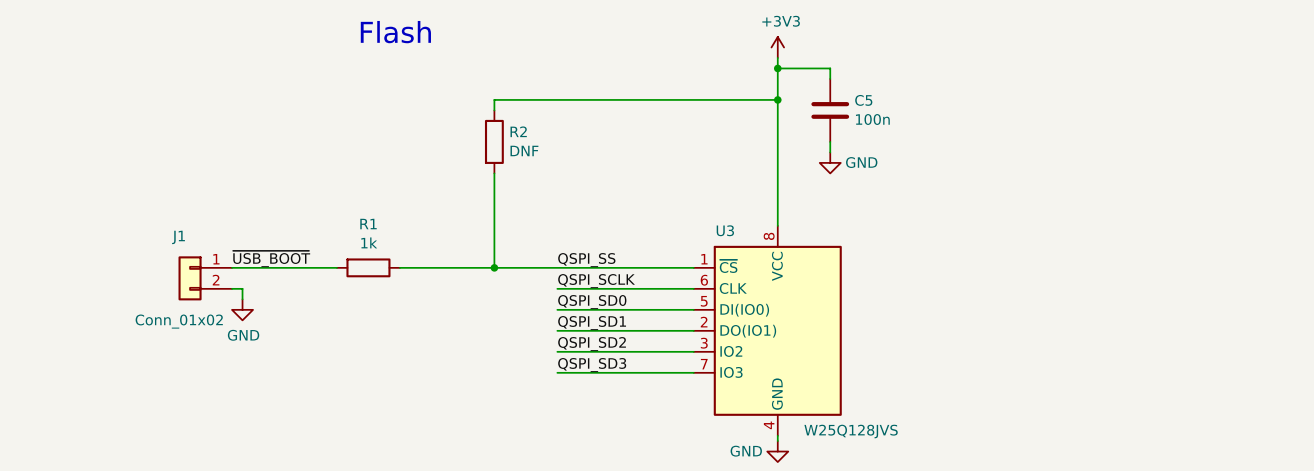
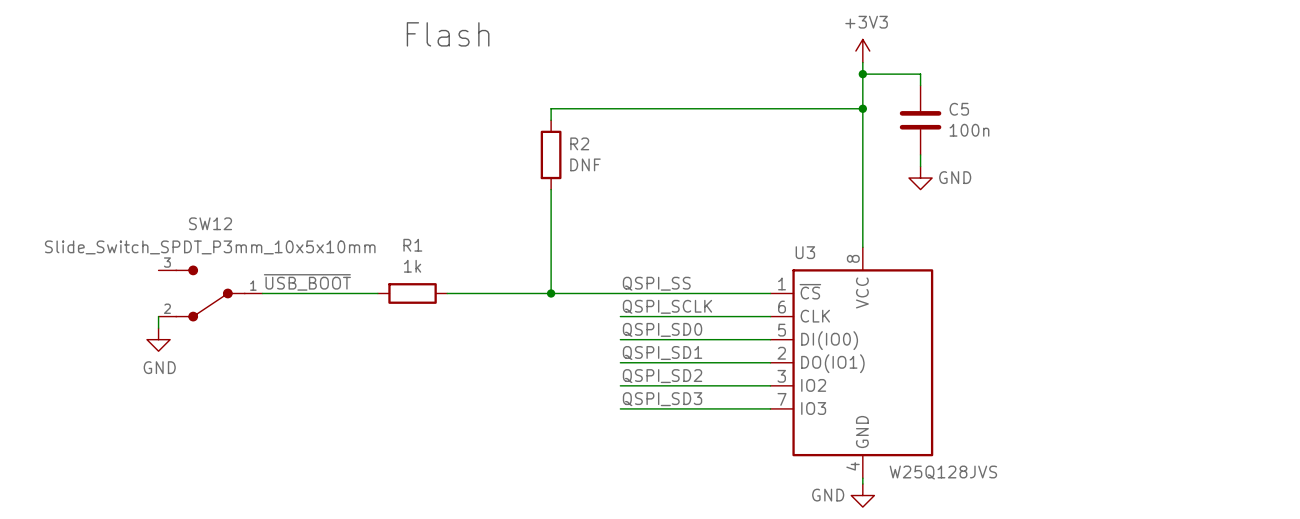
SW12: none -> Slide_Switch_SPDT_P3mm_10x5x10mm (210, 293)
J1: Conn_01x02 (205, 278) -> none
wire: none -> (158, 316) (158, 328)
wire: (232, 288) (242, 288) (242, 299) -> none
power symbol position: GND (242, 309) -> GND (158, 339)

